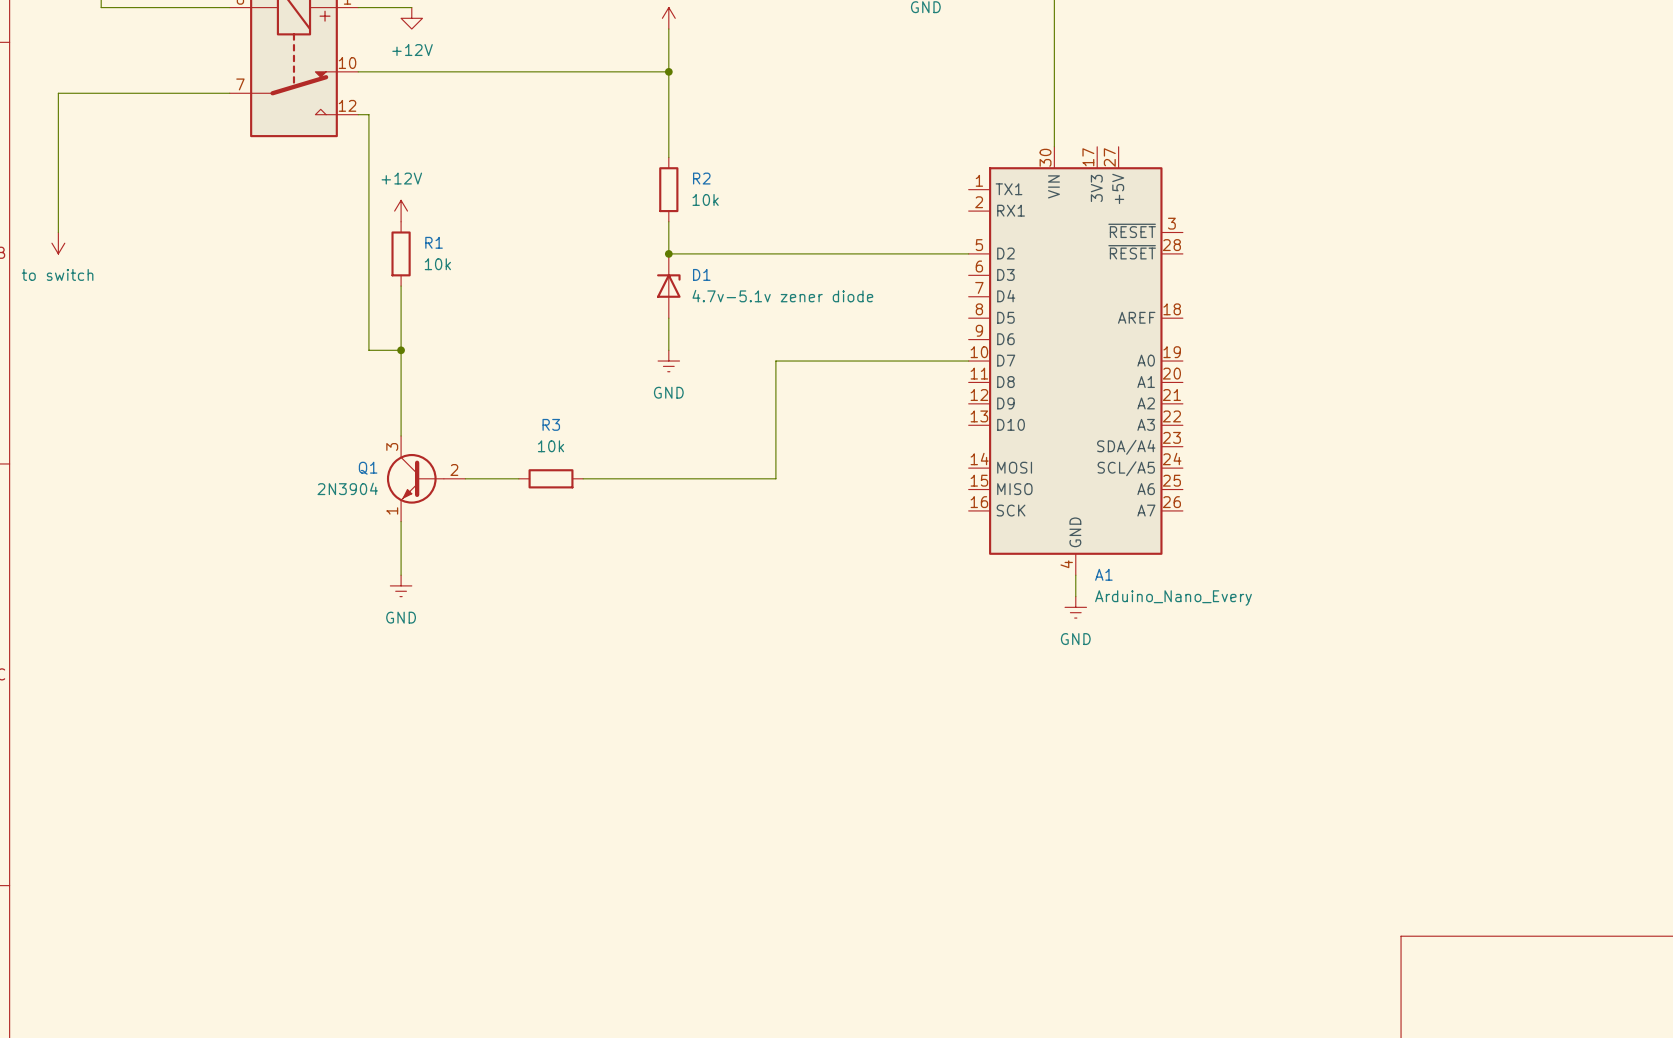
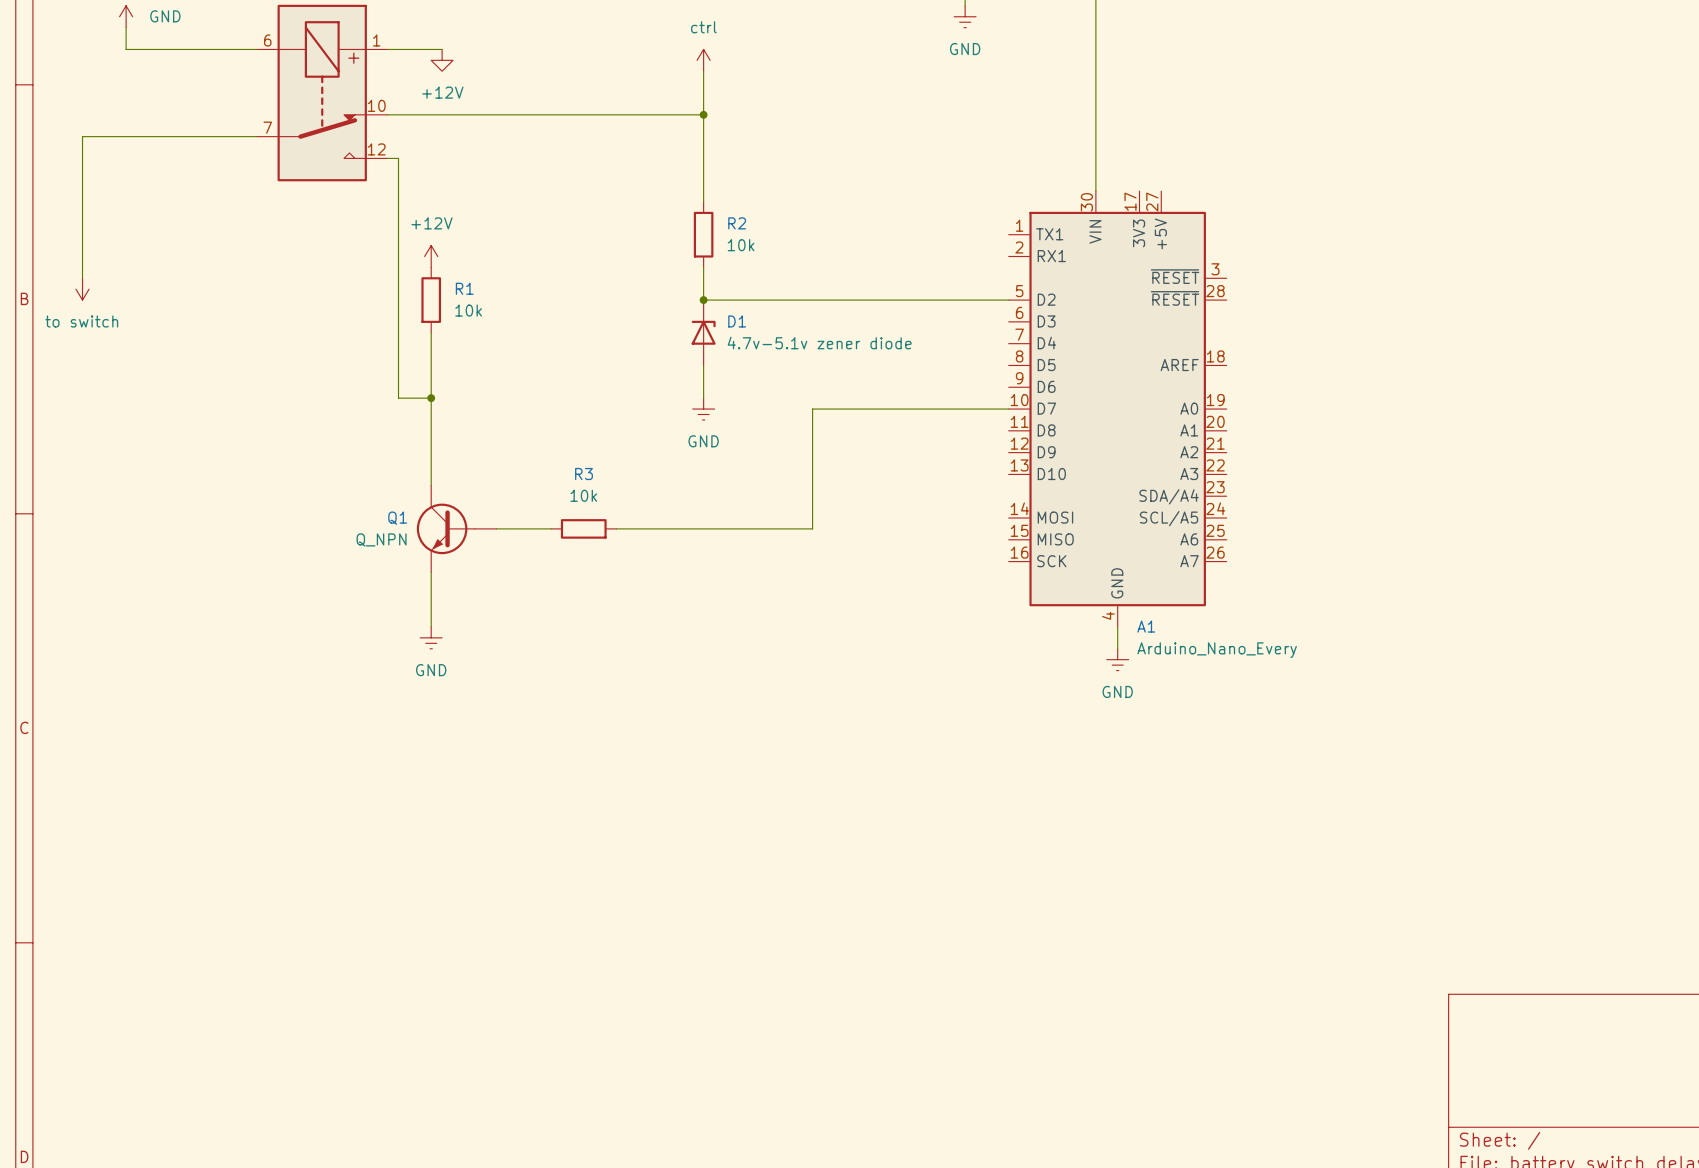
Q1 pin number: 3 (392, 446) -> none
Q1 pin number: 2 (454, 469) -> none
Q1 value: 2N3904 (347, 488) -> Q_NPN (381, 539)
Q1 pin number: 1 (392, 510) -> none

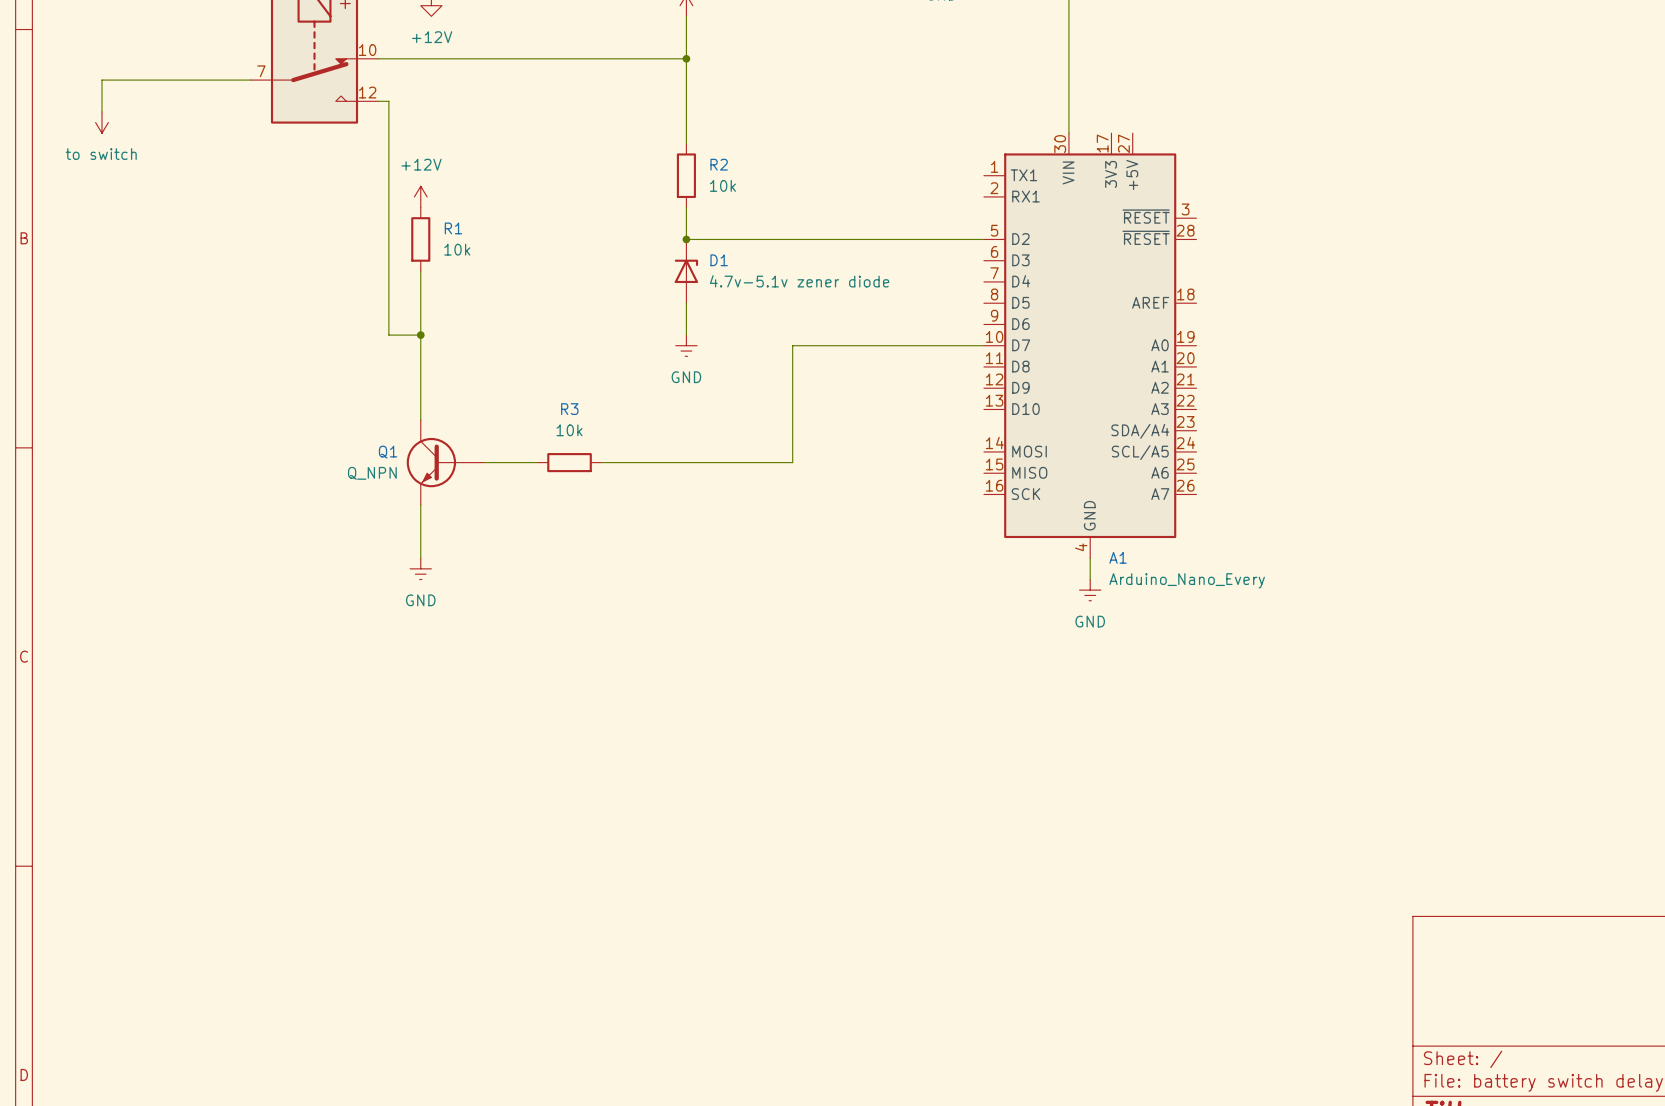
wire: (104, 136) (82, 136) (82, 278) -> (101, 80) (101, 111)
power symbol position: to switch (82, 289) -> to switch (101, 122)

